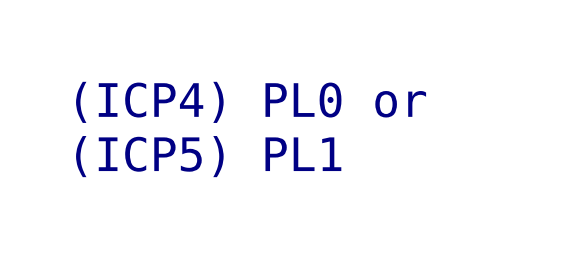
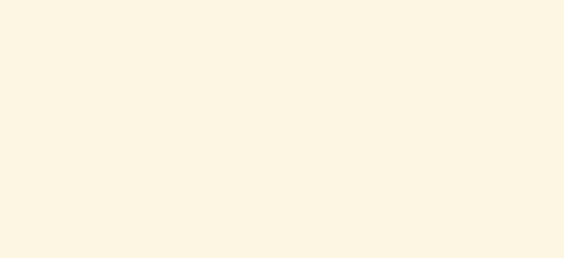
text: (ICP4) PL0 or (251, 102) -> none
text: (ICP5) PL1 (208, 156) -> none

